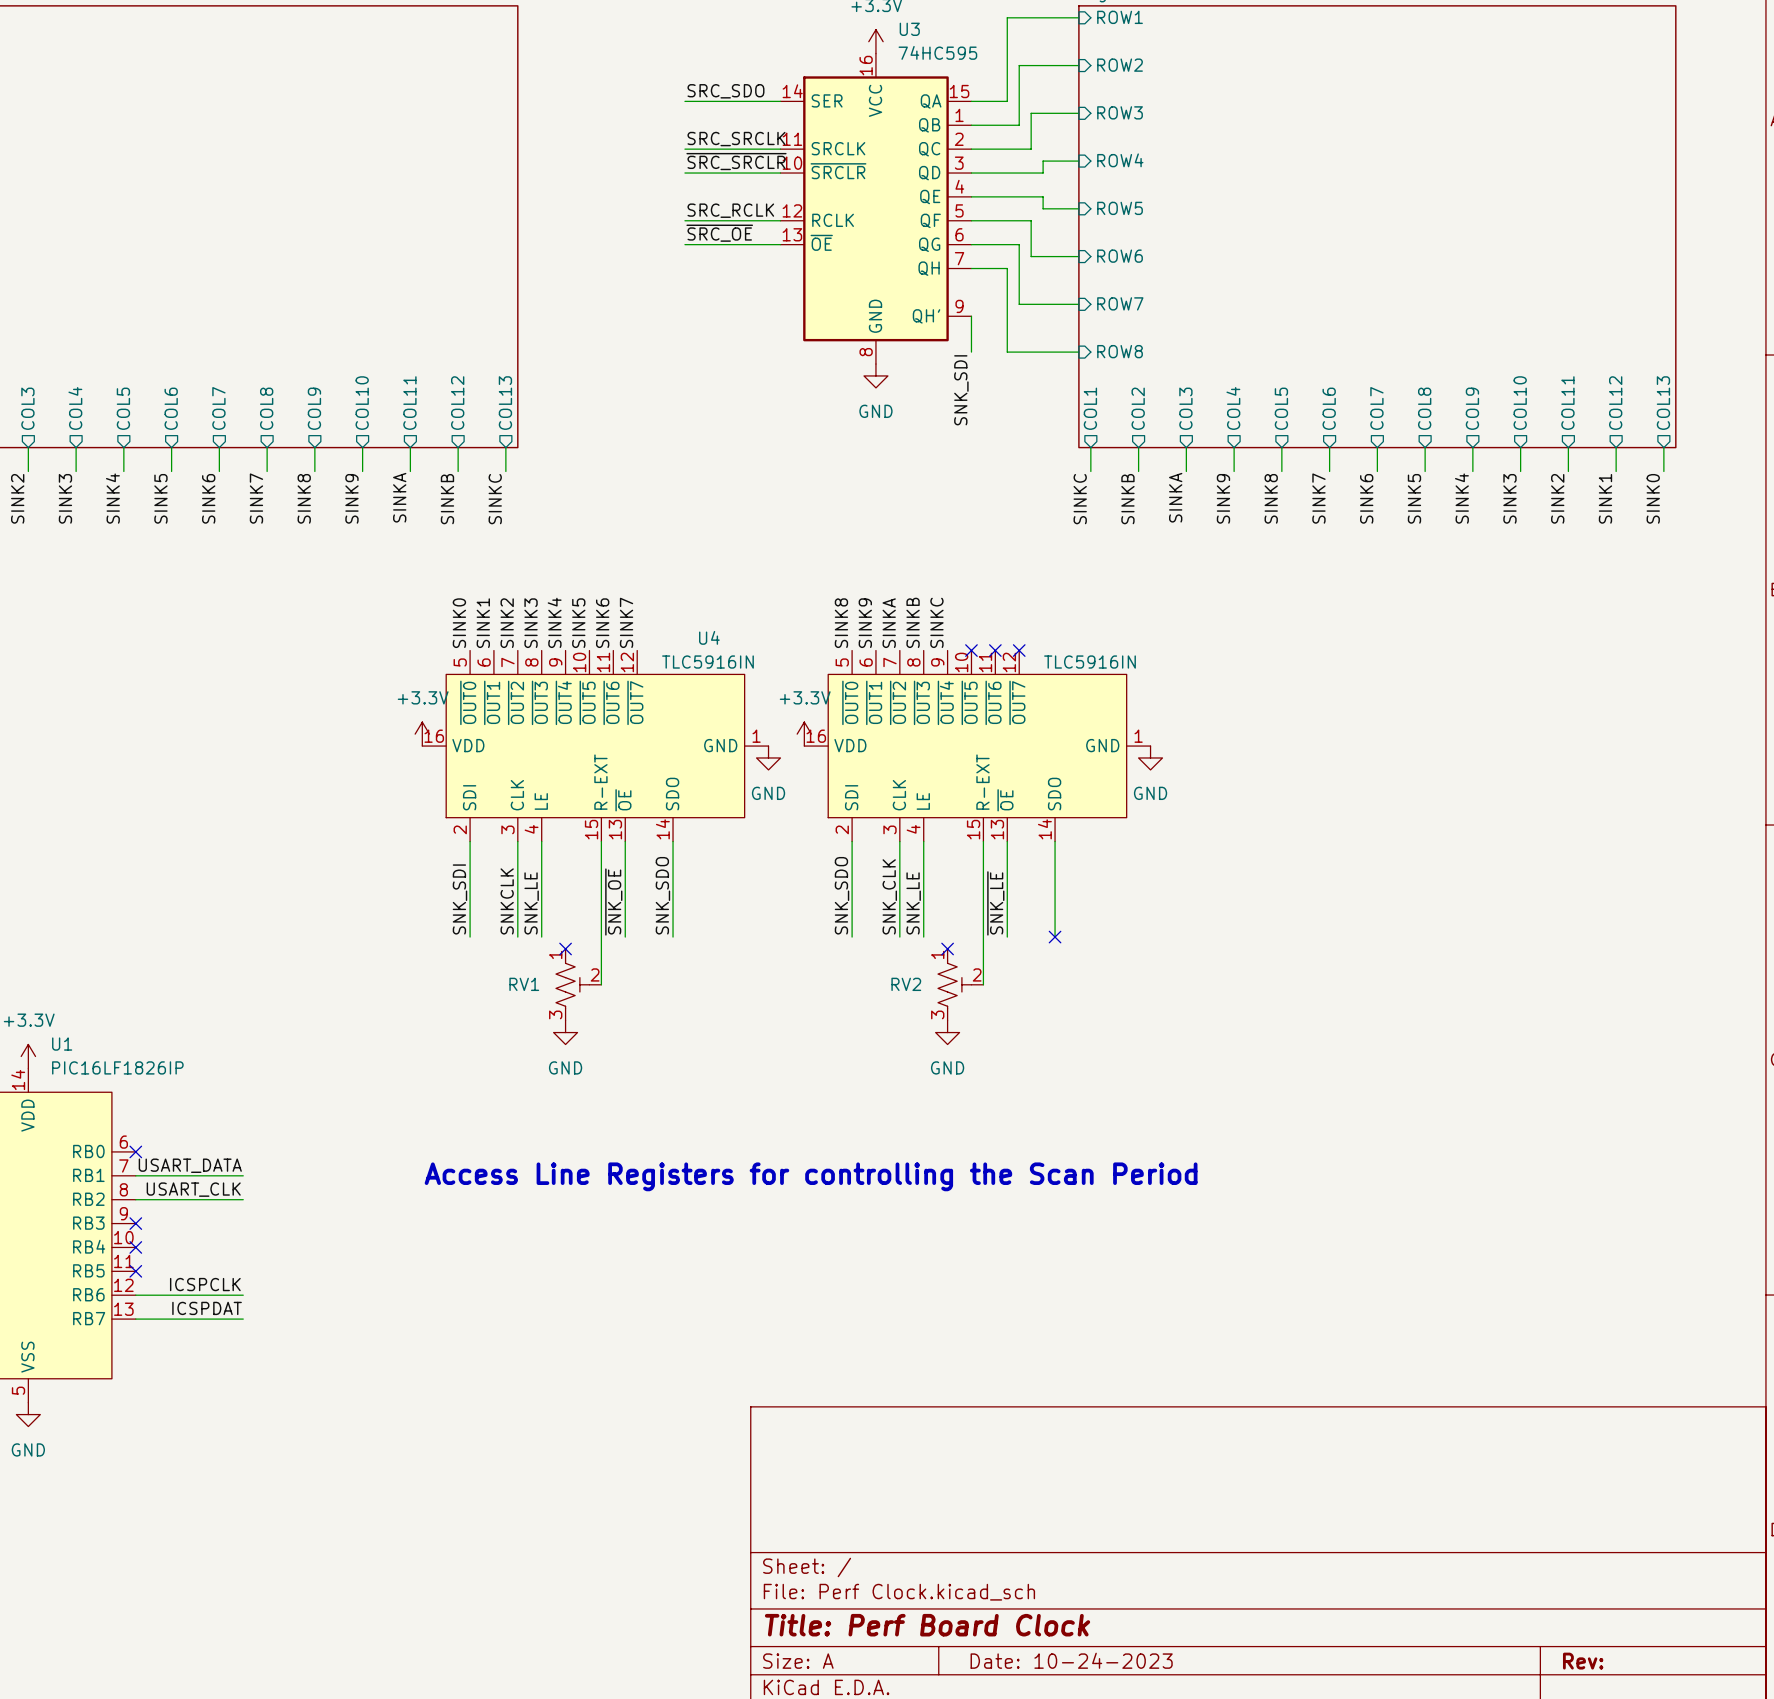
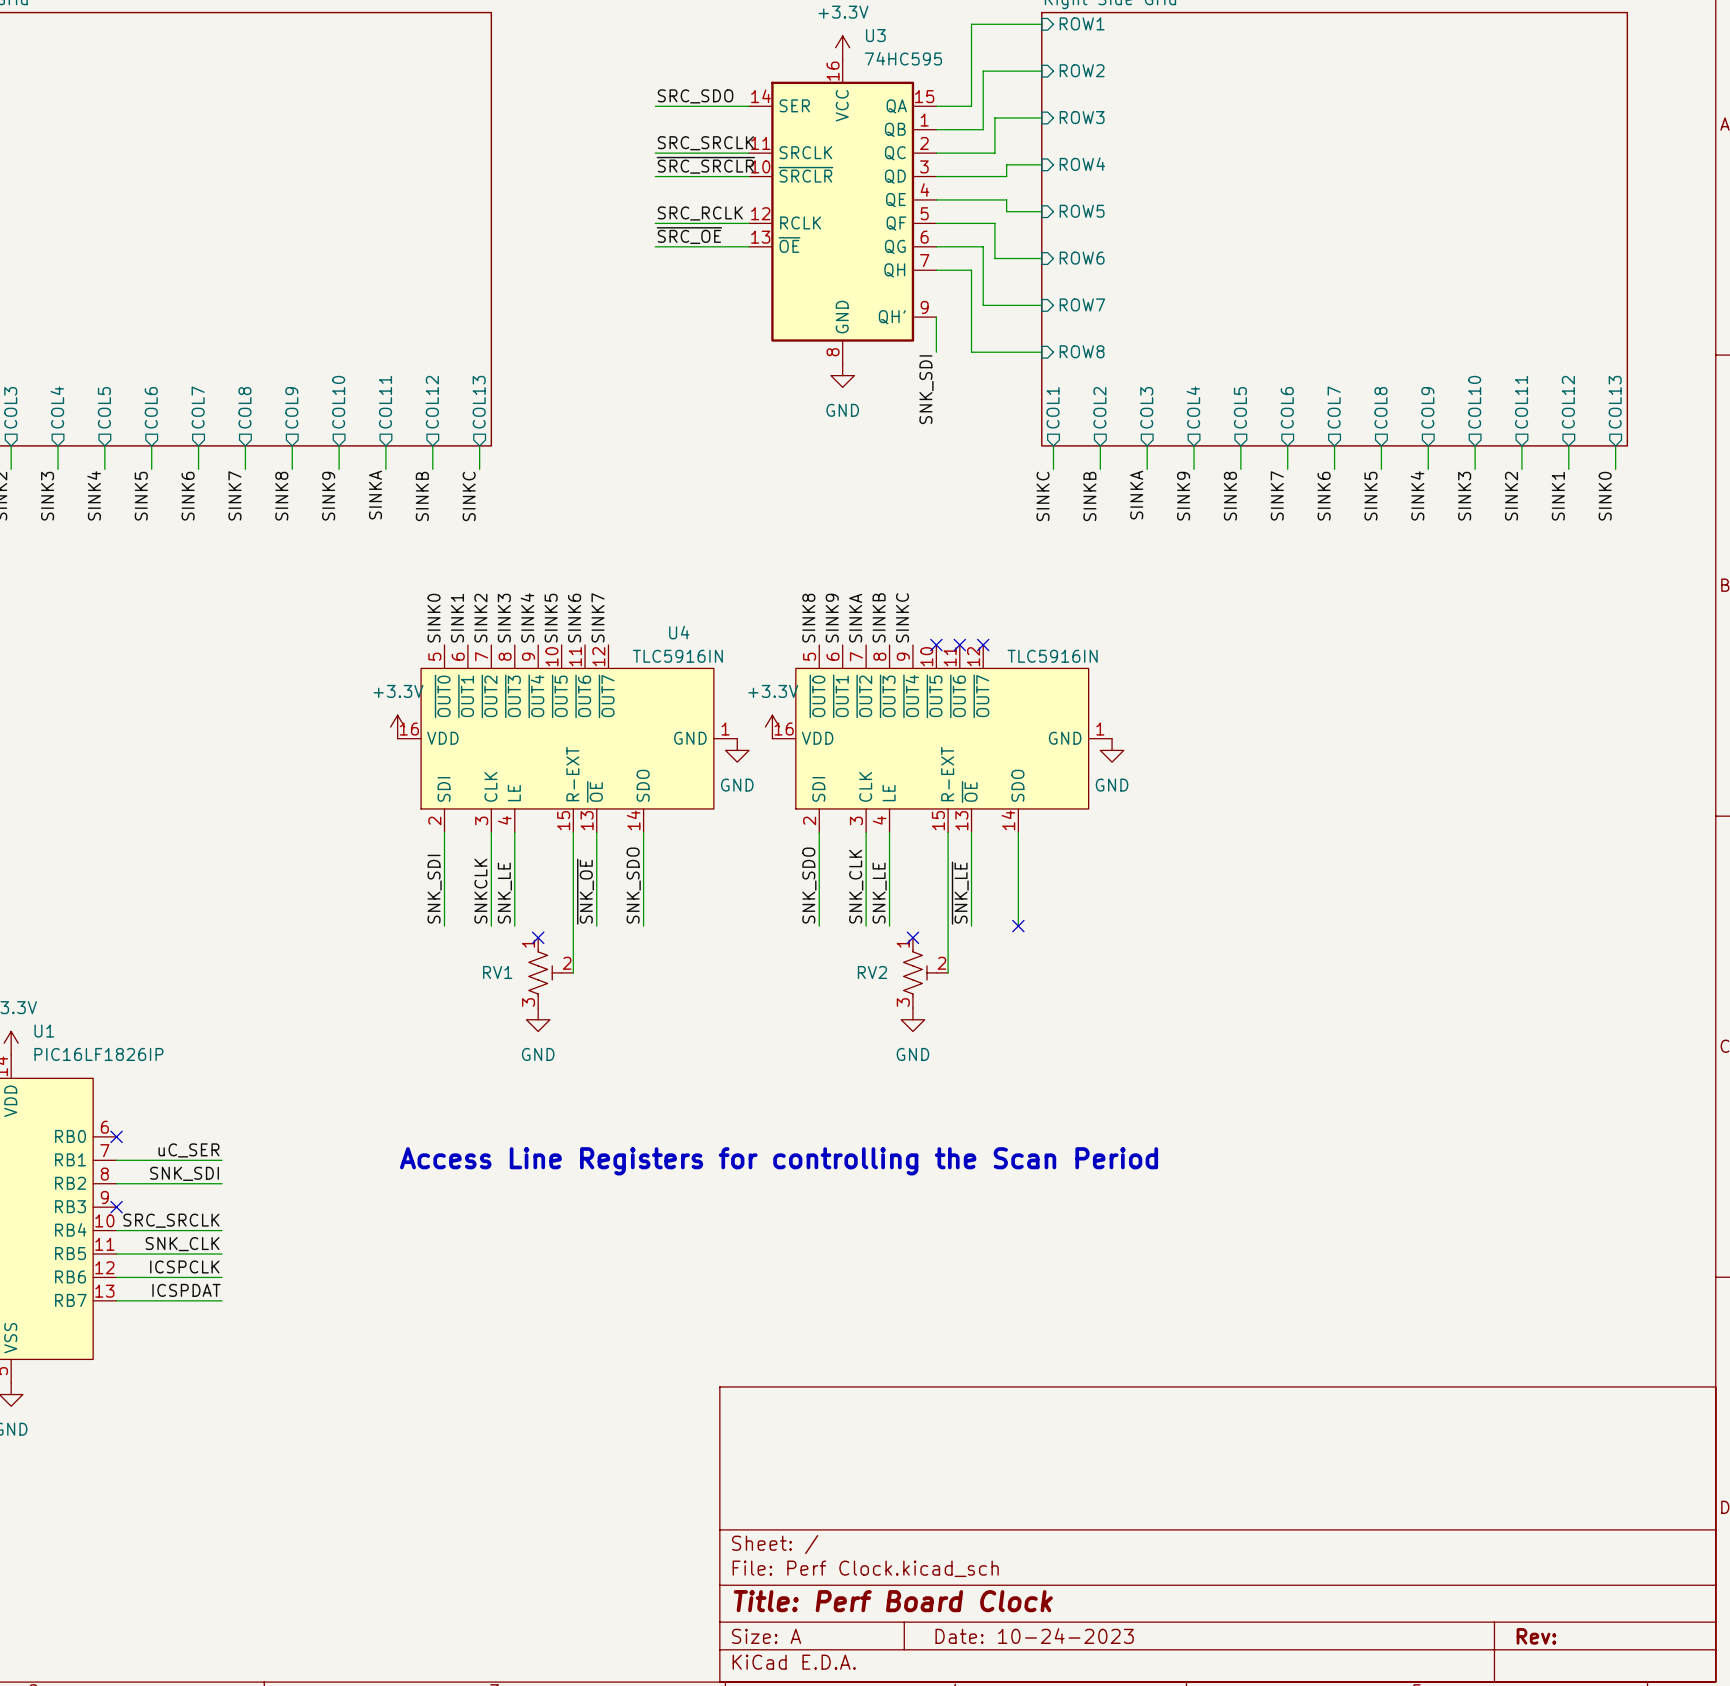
label: USART_DATA (190, 1165) -> uC_SER (188, 1150)
label: USART_CLK (193, 1189) -> SNK_SDI (184, 1173)
label: none -> SRC_SRCLK (171, 1220)
wire: none -> (116, 1230) (221, 1230)
no-connect mark: (135, 1247) -> none
label: none -> SNK_CLK (182, 1244)
wire: none -> (116, 1254) (221, 1254)
no-connect mark: (135, 1271) -> none

